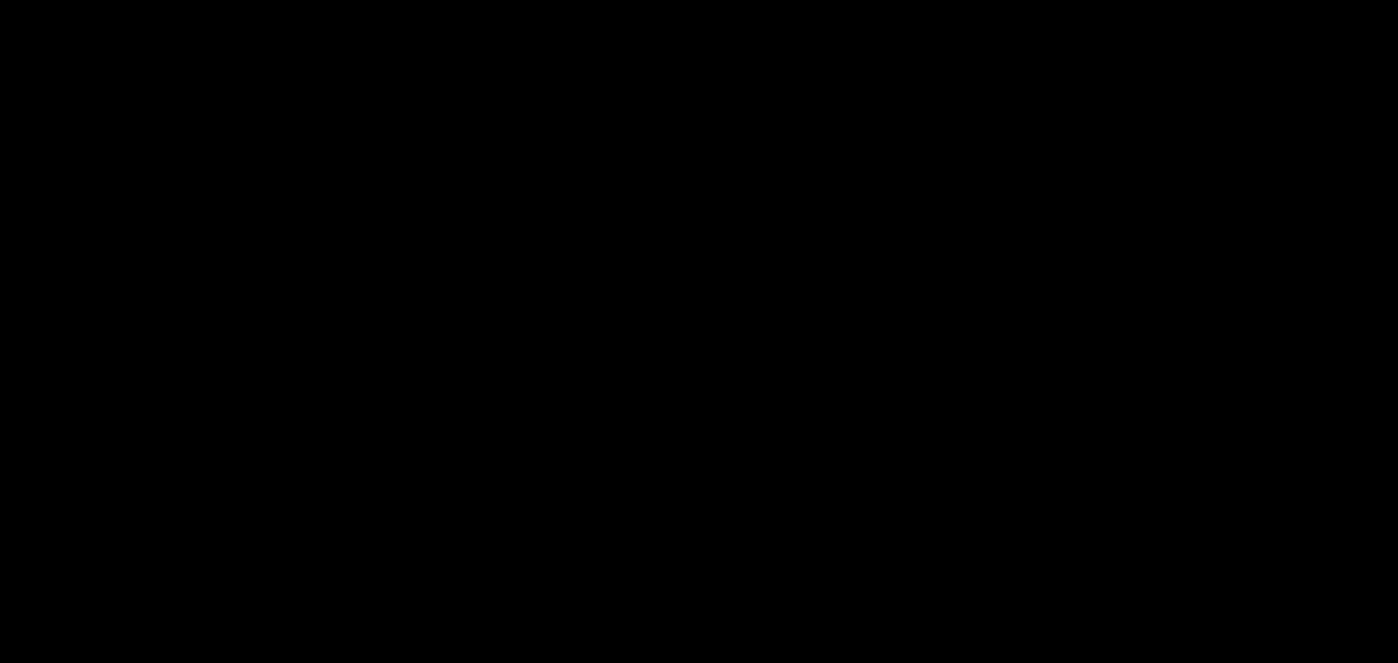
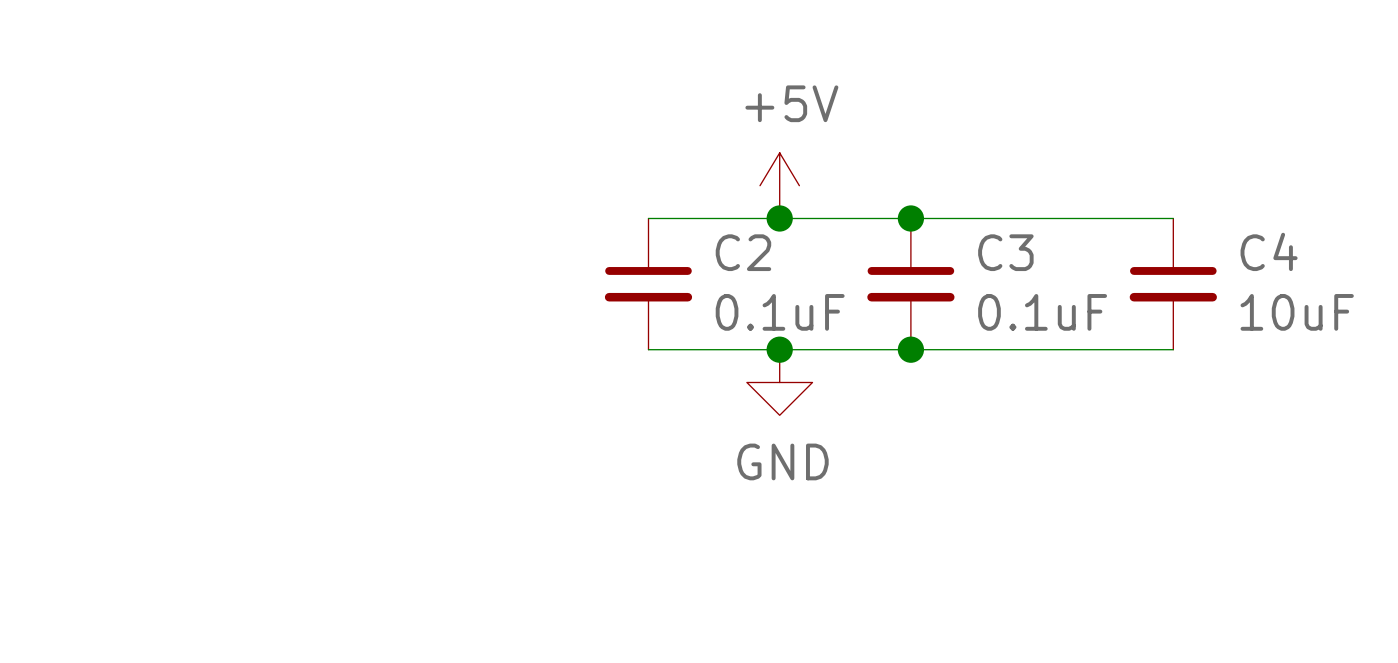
power symbol: none -> +5V (779, 185)
wire: none -> (648, 218) (1173, 218)
junction: none -> (779, 218)
junction: none -> (910, 218)
C2: none -> 0.1uF (648, 284)
C3: none -> 0.1uF (910, 284)
C4: none -> 10uF (1173, 284)
wire: none -> (648, 349) (1173, 349)
junction: none -> (779, 349)
junction: none -> (910, 349)
power symbol: none -> GND (779, 382)

